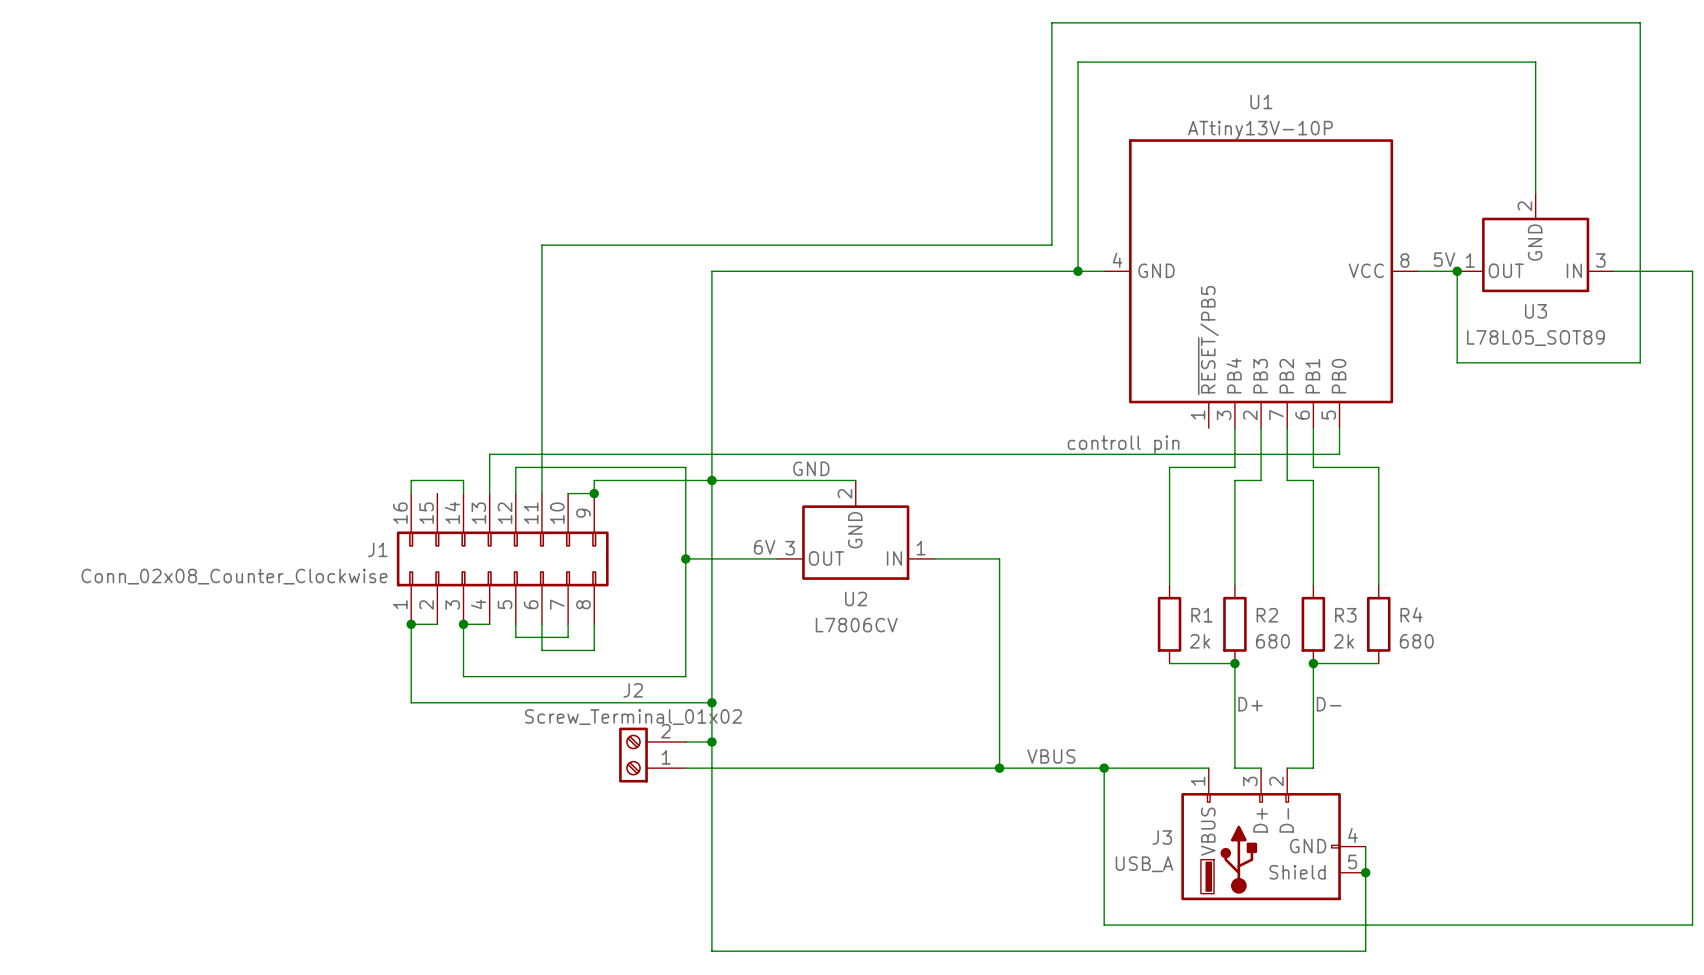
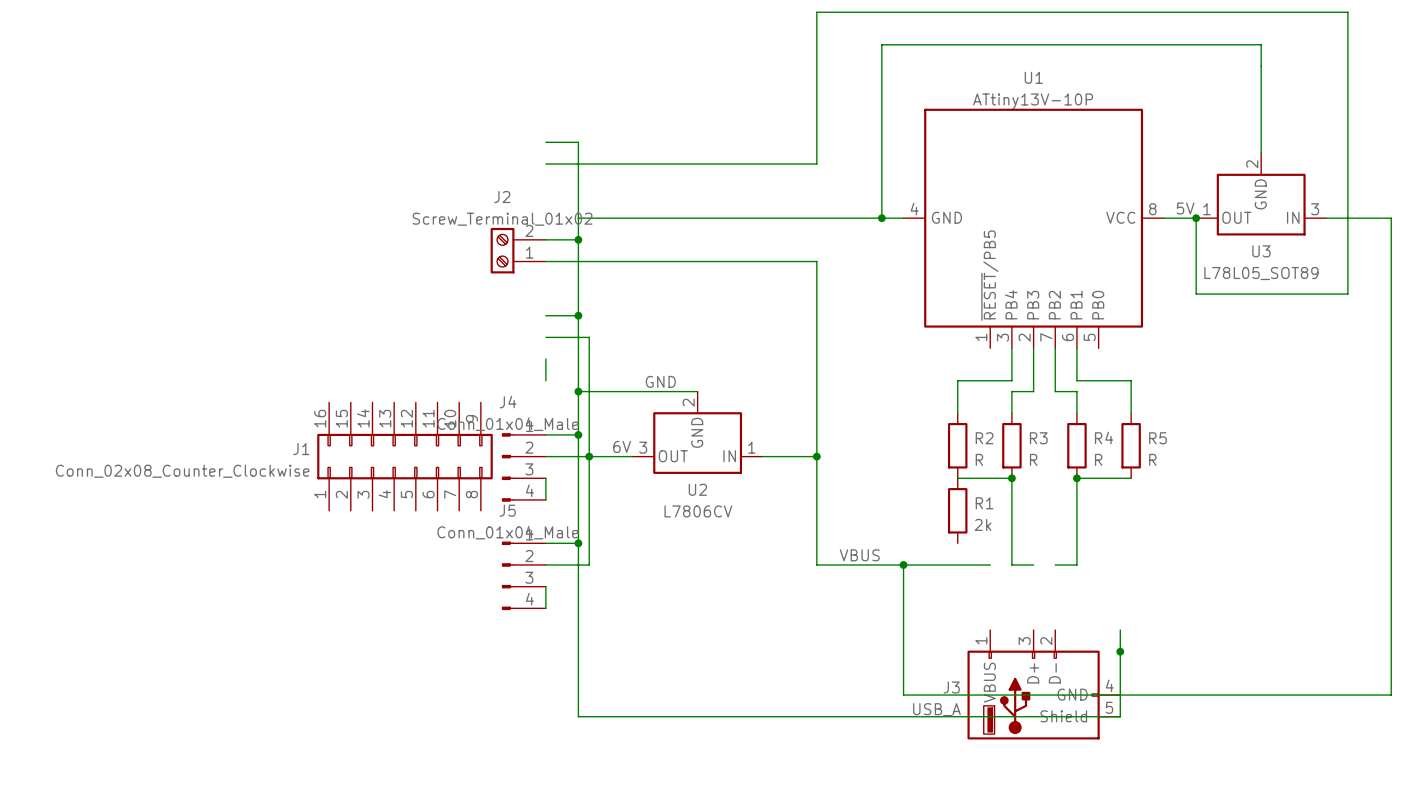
wire: (1051, 22) (1051, 245) (541, 245) (541, 493) -> (860, 12) (816, 12) (816, 163) (545, 163)
wire: none -> (545, 142) (578, 142) (578, 218)
wire: none -> (545, 239) (578, 239)
junction: none -> (578, 239)
wire: none -> (545, 261) (816, 261) (816, 456)
wire: none -> (545, 315) (578, 315)
junction: none -> (578, 315)
wire: none -> (545, 337) (589, 337) (589, 564) (545, 564)
wire: (1339, 428) (1339, 454) (489, 454) (489, 493) -> none
wire: none -> (545, 359) (545, 380)
label: controll pin (1123, 444) -> none
wire: (711, 480) (594, 480) (594, 493) (568, 493) -> none
wire: (411, 493) (411, 480) (463, 480) (463, 493) -> none
wire: (515, 493) (515, 467) (685, 467) (685, 676) (463, 676) (463, 624) (489, 624) -> none
junction: (594, 493) -> none
wire: (1169, 506) (1169, 585) -> (903, 564) (903, 630)
wire: (1234, 506) (1234, 585) -> none
wire: (1313, 506) (1313, 585) -> none
wire: (1378, 506) (1378, 585) -> none
wire: none -> (545, 434) (578, 434)
junction: none -> (578, 434)
R5: none -> R (1131, 445)
wire: none -> (545, 456) (556, 456)
junction: (685, 558) -> none
junction: none -> (589, 456)
junction: none -> (816, 456)
J4: none -> Conn_01x04_Male (523, 467)
wire: none -> (545, 478) (545, 499)
junction: none -> (1011, 478)
junction: none -> (1076, 478)
junction: (411, 624) -> none
wire: (437, 624) (411, 624) (411, 702) (711, 702) -> none
junction: (463, 624) -> none
wire: (515, 624) (515, 637) (568, 637) (568, 624) -> none
wire: (541, 624) (541, 650) (594, 650) (594, 624) -> none
R2 position: (1234, 624) -> (957, 445)
R3 position: (1313, 624) -> (1011, 445)
R4 position: (1378, 624) -> (1076, 445)
R2 value: 680 (1272, 641) -> R (979, 459)
R3 value: 2k (1343, 641) -> R (1033, 459)
R4 value: 680 (1416, 641) -> R (1098, 459)
wire: none -> (545, 543) (578, 543)
junction: none -> (578, 543)
wire: (1169, 663) (1234, 663) -> (957, 478) (1011, 478) (1011, 543)
junction: (1234, 663) -> none
wire: (1313, 663) (1378, 663) -> (1076, 543) (1076, 478) (1131, 478)
junction: (1313, 663) -> none
wire: (999, 689) (999, 768) -> (816, 564) (990, 564)
junction: none -> (903, 564)
wire: (1234, 689) (1234, 768) (1261, 768) -> (1011, 564) (1033, 564)
wire: (1313, 689) (1313, 768) (1287, 768) -> (1076, 564) (1055, 564)
J5: none -> Conn_01x04_Male (523, 575)
junction: (711, 702) -> none
label: D+ (1250, 704) -> none
label: D- (1329, 704) -> none
wire: none -> (545, 586) (545, 608)
wire: (685, 741) (711, 741) -> none
junction: (711, 741) -> none
J2 position: (652, 755) -> (518, 250)
label position: VBUS (1051, 756) -> VBUS (859, 555)
wire: (685, 768) (1208, 768) -> none
junction: (999, 768) -> none
junction: (1104, 768) -> none
wire: none -> (1120, 630) (1120, 695)
junction: none -> (1120, 651)
wire: (1104, 846) (1104, 925) (1692, 925) (1692, 846) -> (903, 695) (1391, 695)
wire: (711, 872) (711, 951) (1365, 951) (1365, 872) -> (578, 716) (1120, 716)
junction: (1365, 872) -> none

